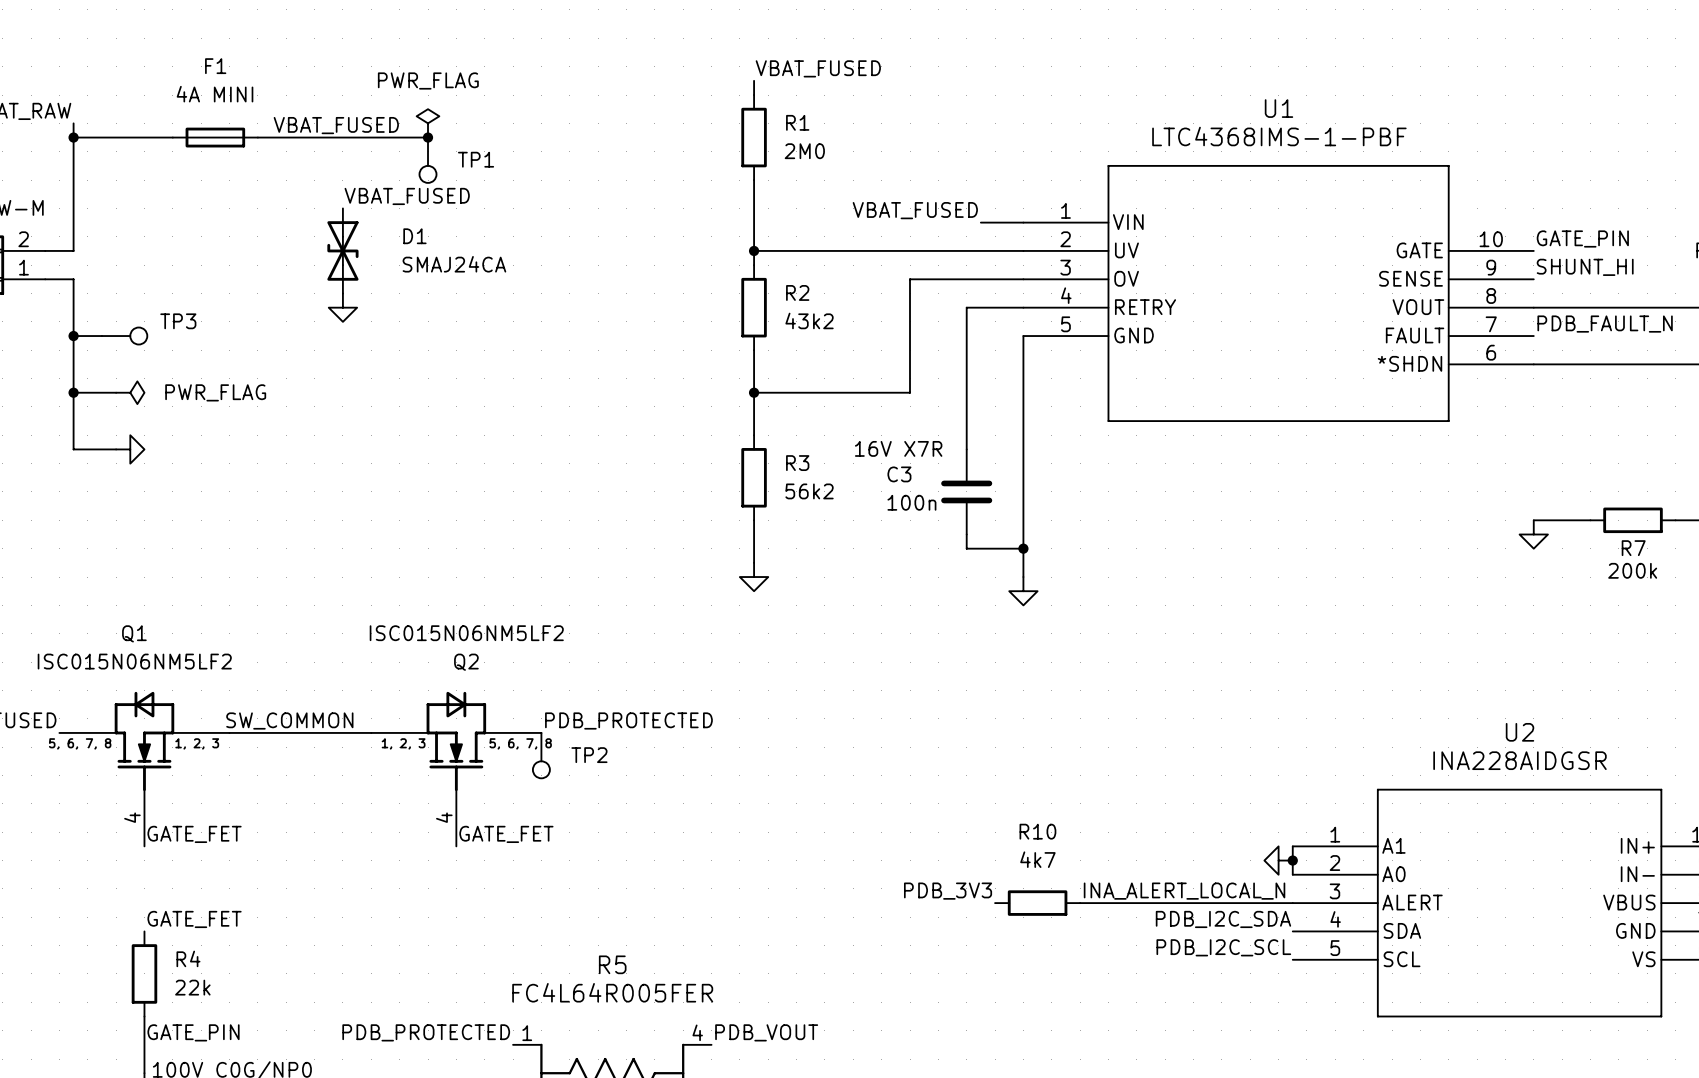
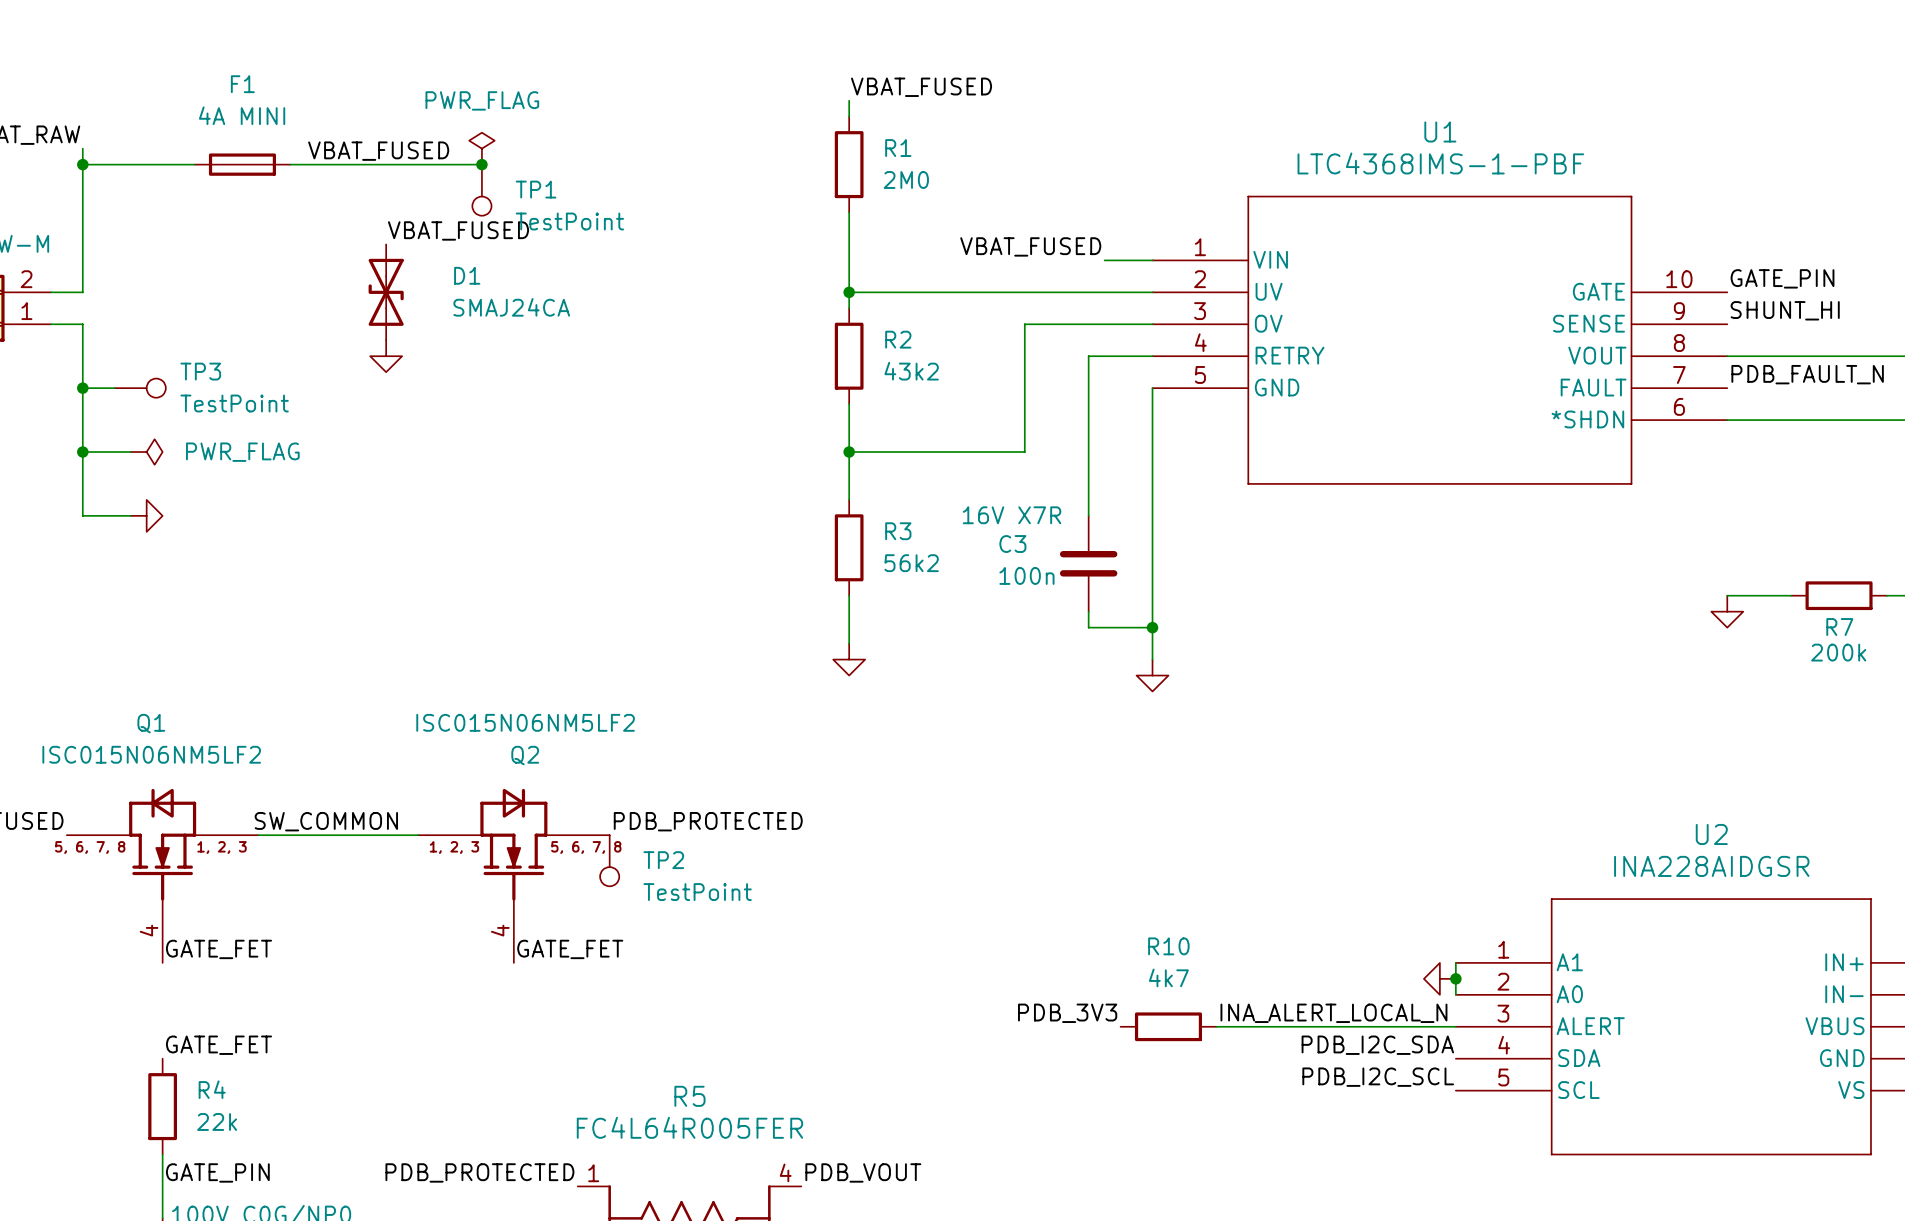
TP1 value: none -> TestPoint (569, 221)
TP3 value: none -> TestPoint (234, 403)
TP2 value: none -> TestPoint (697, 892)

